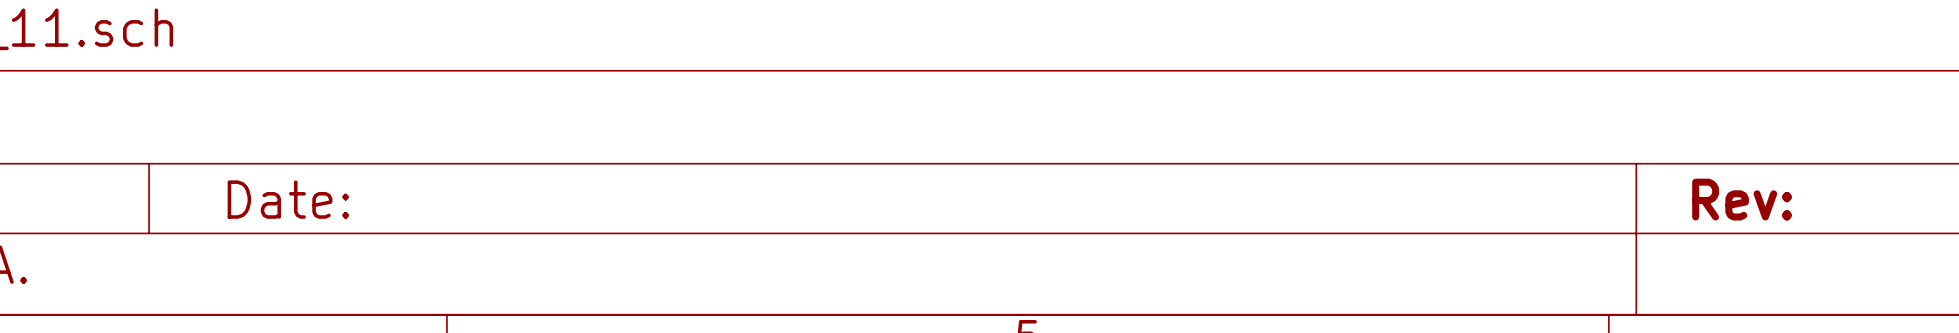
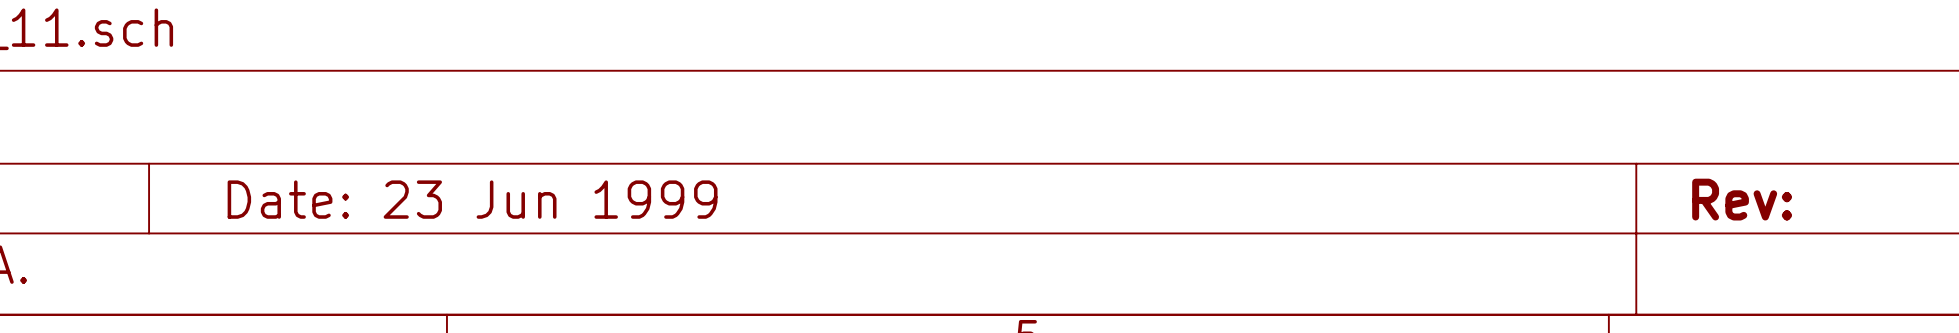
title block: Date: (288, 199) -> Date: 23 Jun 1999 (472, 199)

